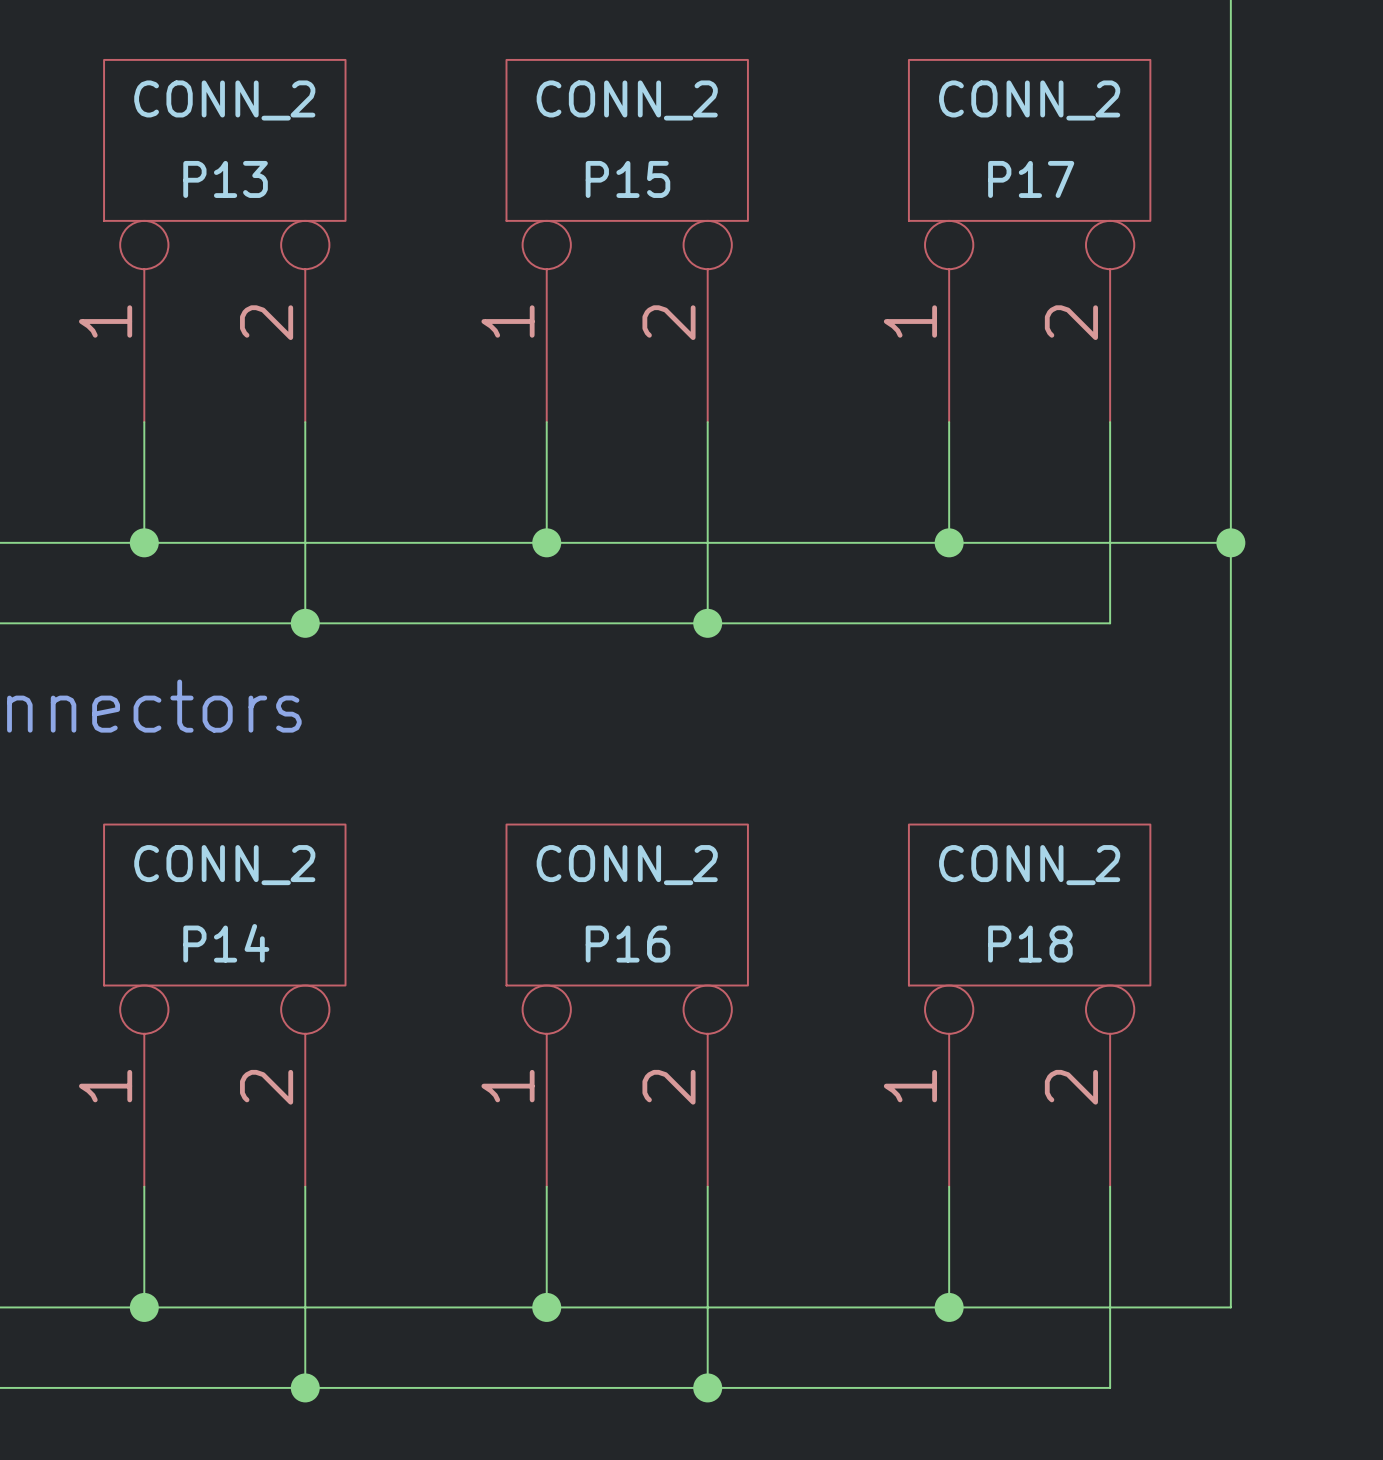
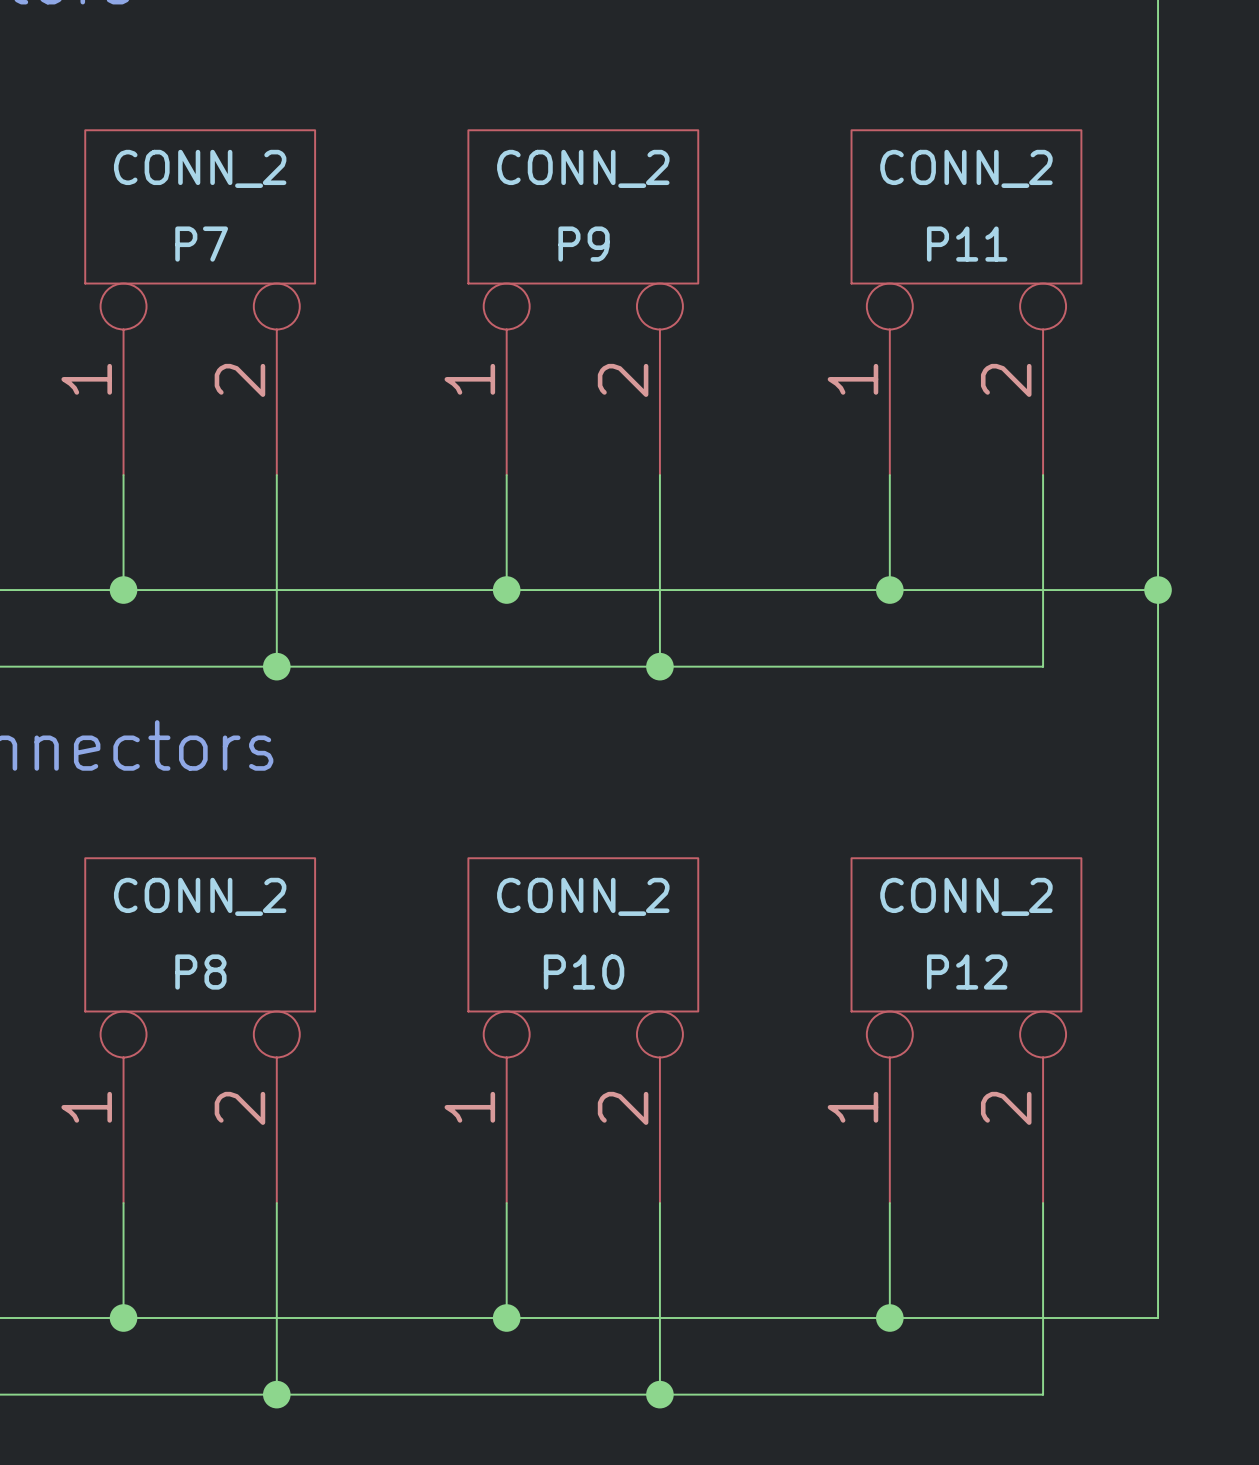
P13 name: P13 (225, 179) -> P7 (201, 244)
P15 name: P15 (627, 179) -> P9 (584, 244)
P17 name: P17 (1031, 179) -> P11 (967, 244)
P14 name: P14 (226, 943) -> P8 (200, 972)
P16 name: P16 (627, 944) -> P10 (584, 972)
P18 name: P18 (1030, 944) -> P12 (967, 972)

